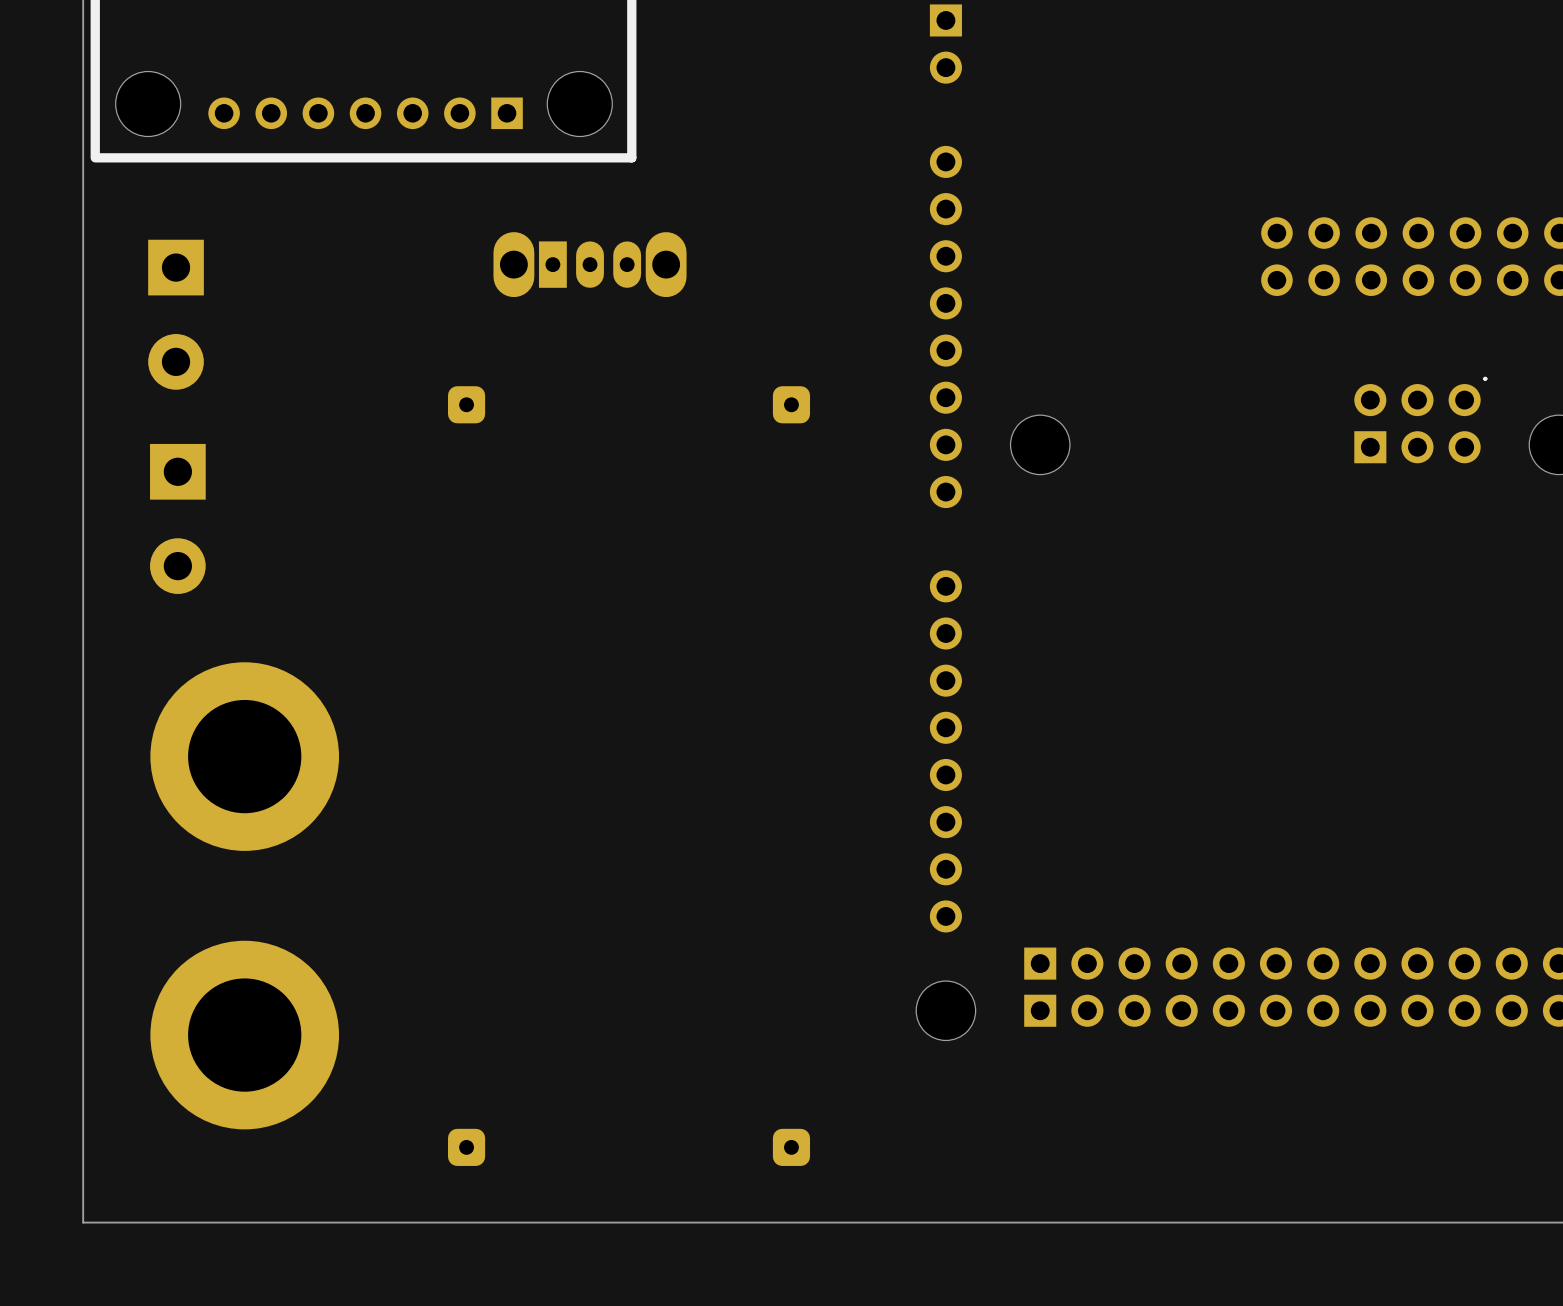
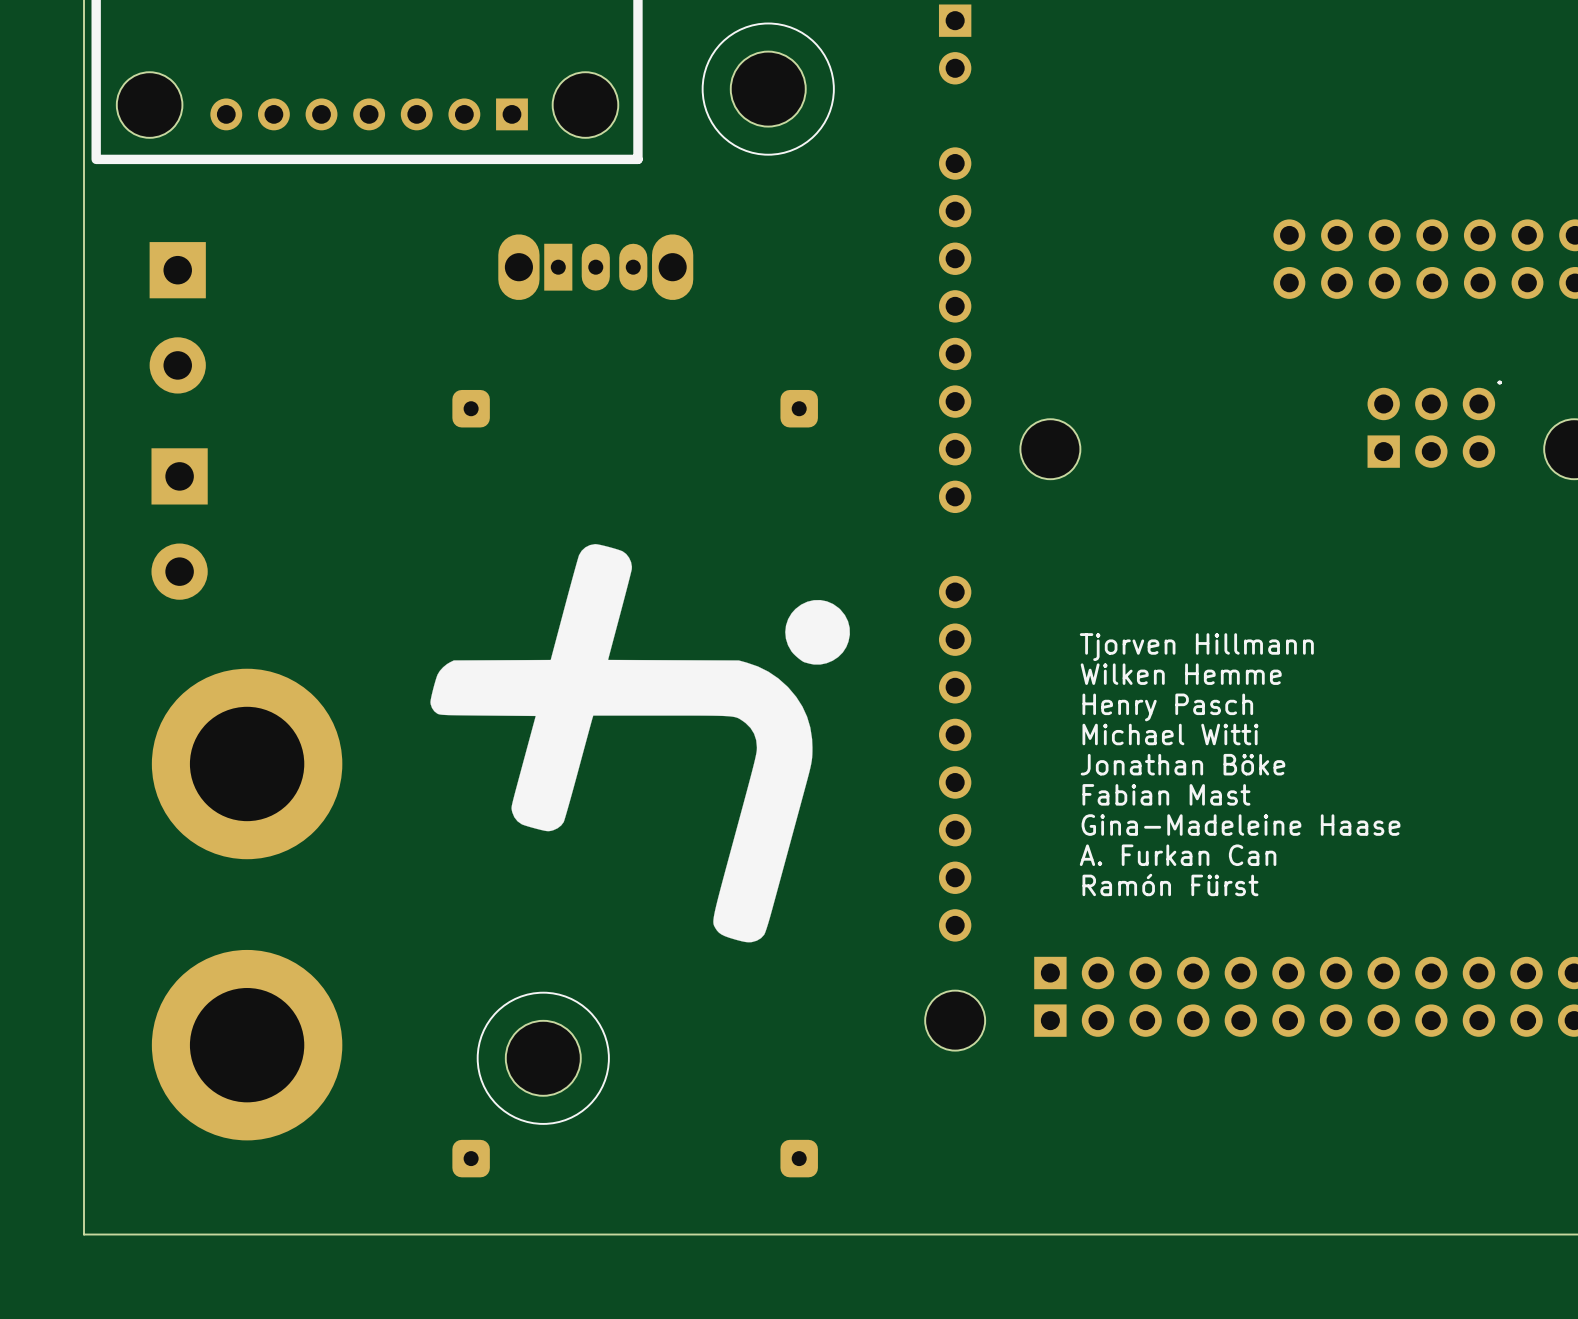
part: none -> (768, 89)
drawing: none -> [430, 544, 850, 943]
text: none -> Tjorven Hillmann (1196, 647)
text: none -> Wilken Hemme (1181, 674)
text: none -> Henry Pasch (1167, 707)
text: none -> Michael Witti (1170, 734)
text: none -> Jonathan Böke (1182, 764)
text: none -> Fabian Mast (1166, 794)
text: none -> Gina-Madeleine Haase (1241, 825)
text: none -> A. Furkan Can (1178, 855)
text: none -> Ramón Fürst (1170, 884)
part: none -> (543, 1058)

